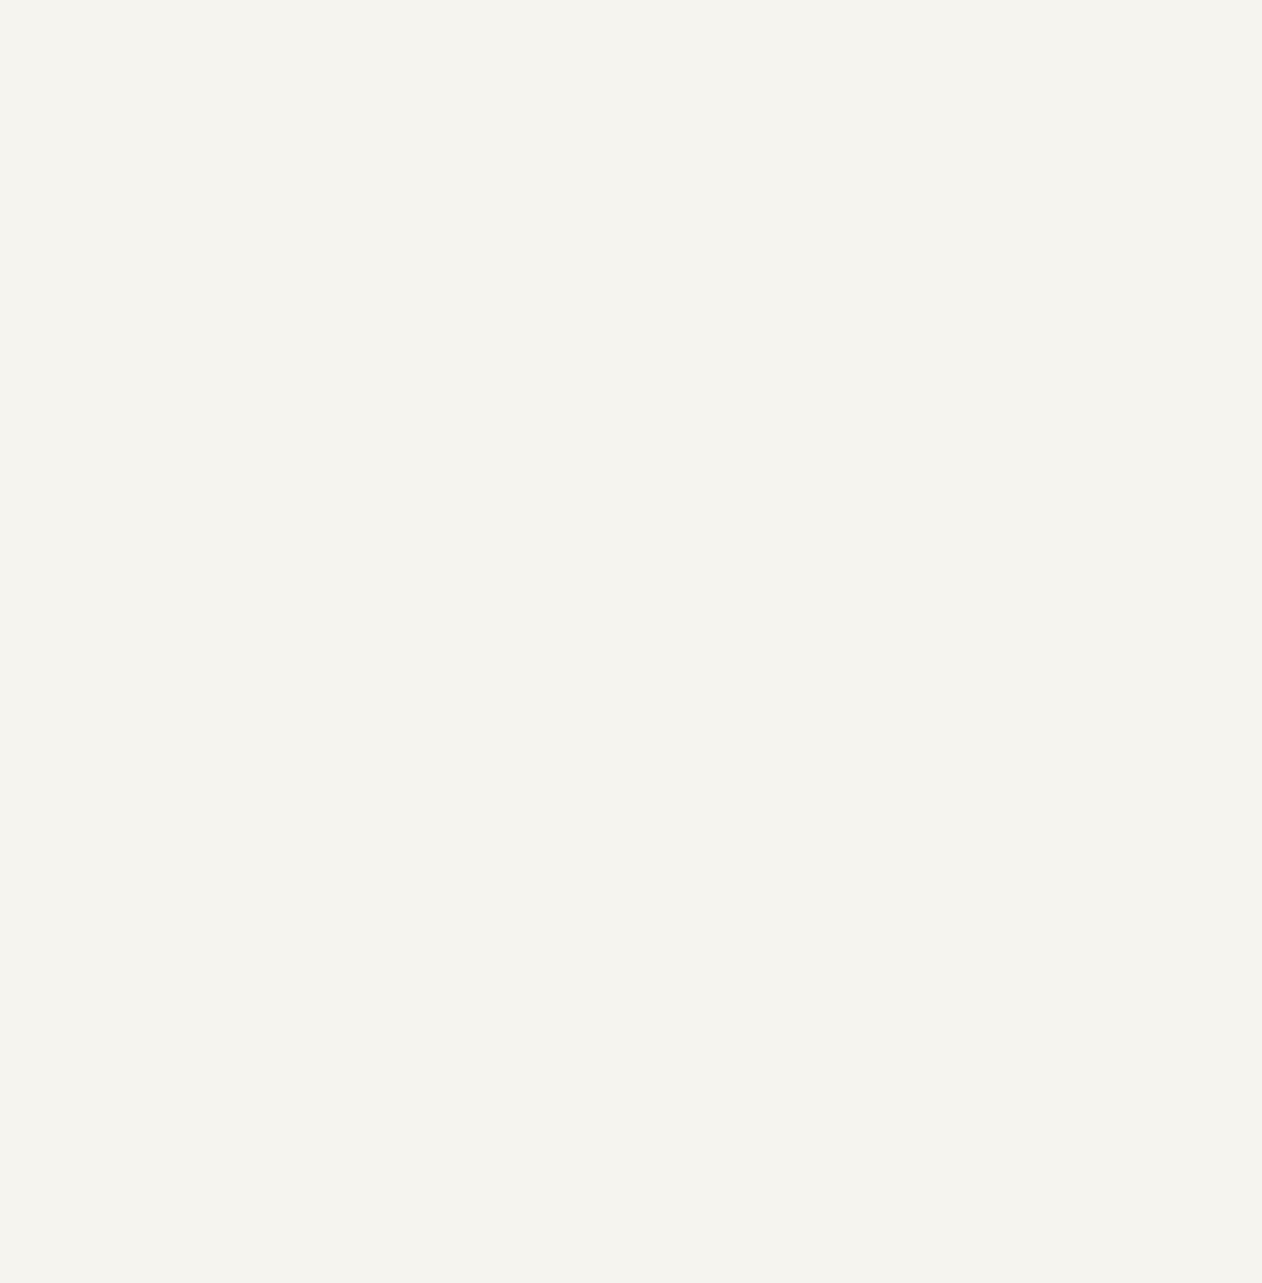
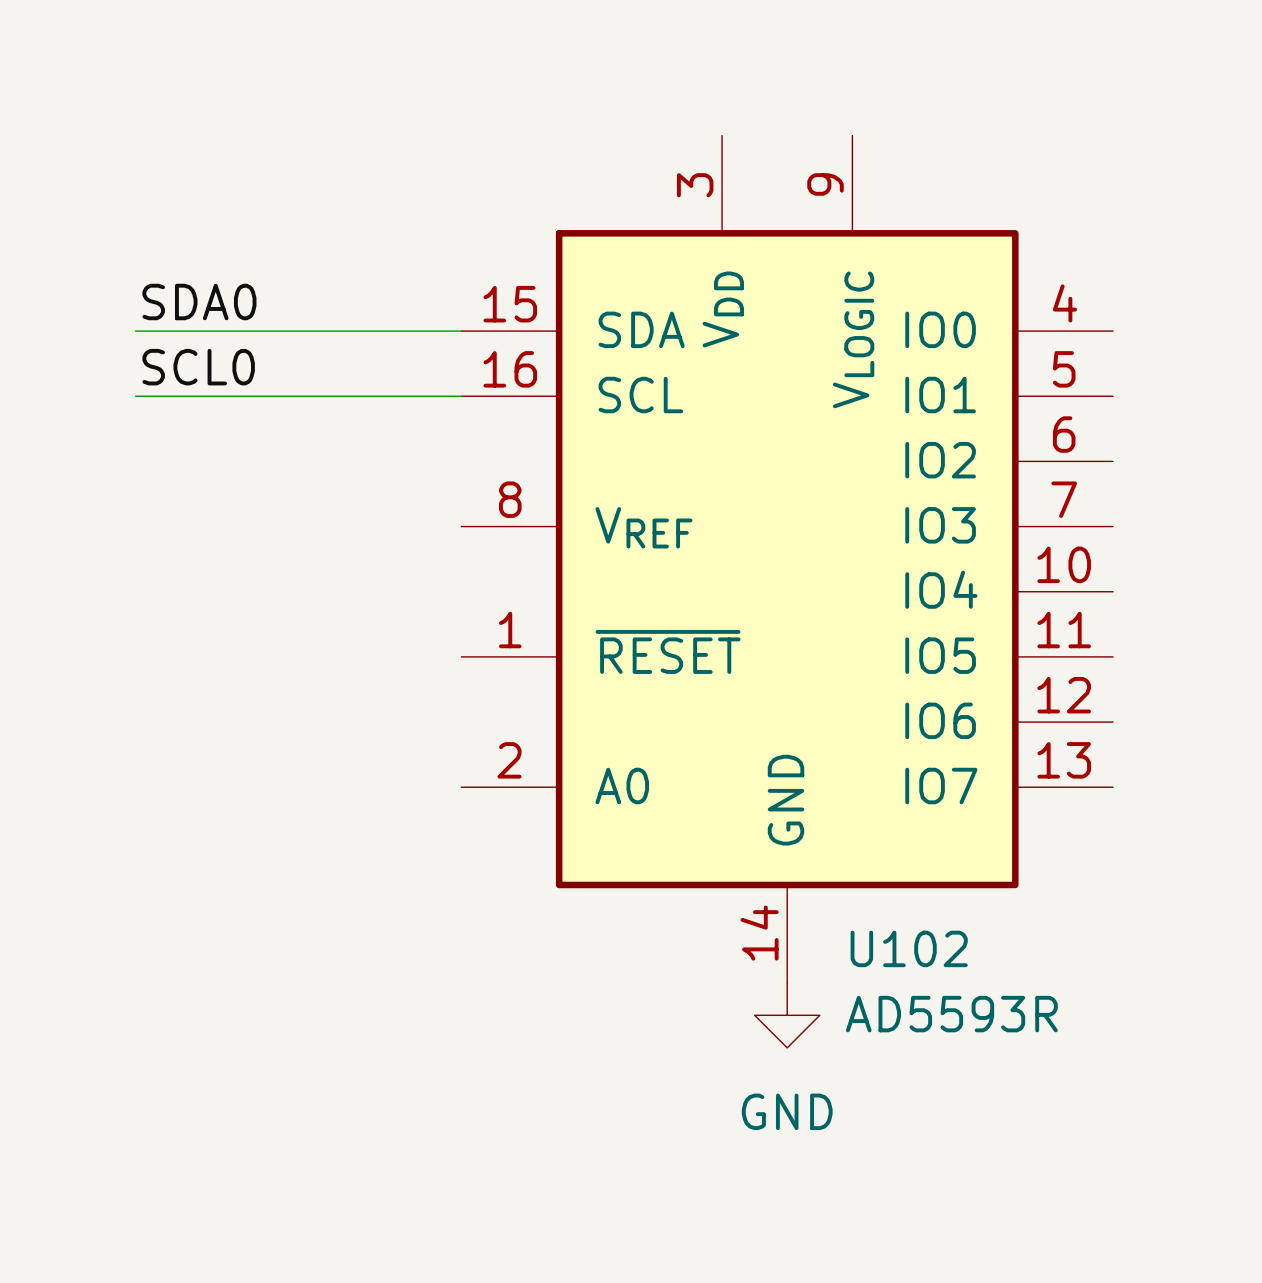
label: none -> SDA0 (199, 302)
wire: none -> (135, 331) (461, 331)
label: none -> SCL0 (198, 367)
wire: none -> (135, 396) (461, 396)
U102: none -> AD5593R (787, 559)
power symbol: none -> GND (787, 1015)

